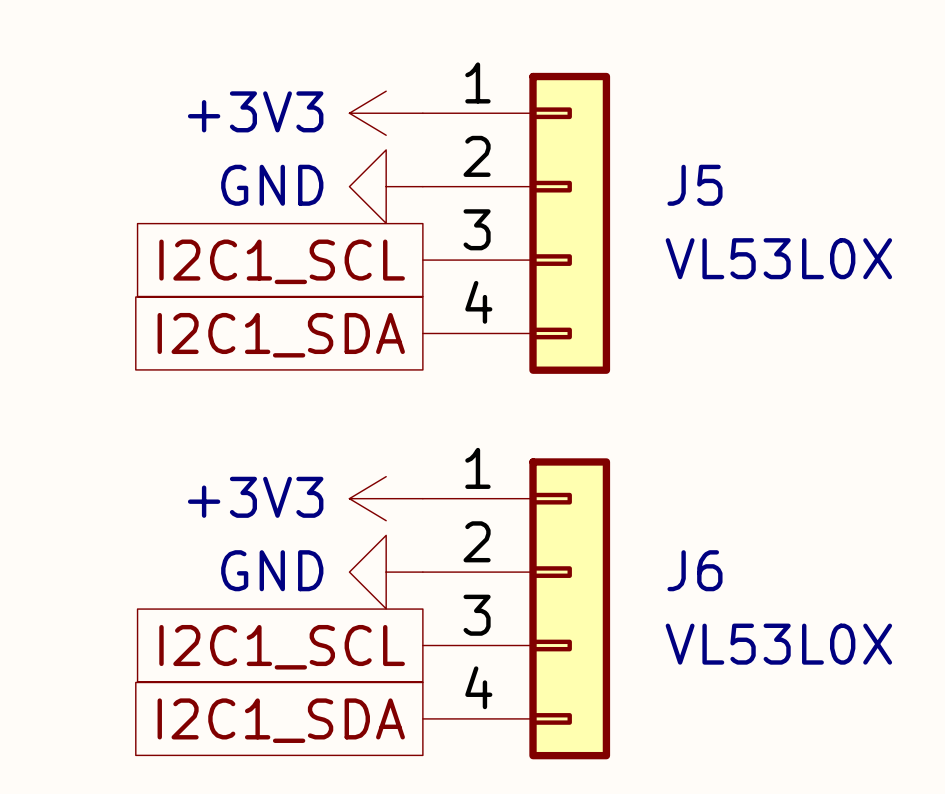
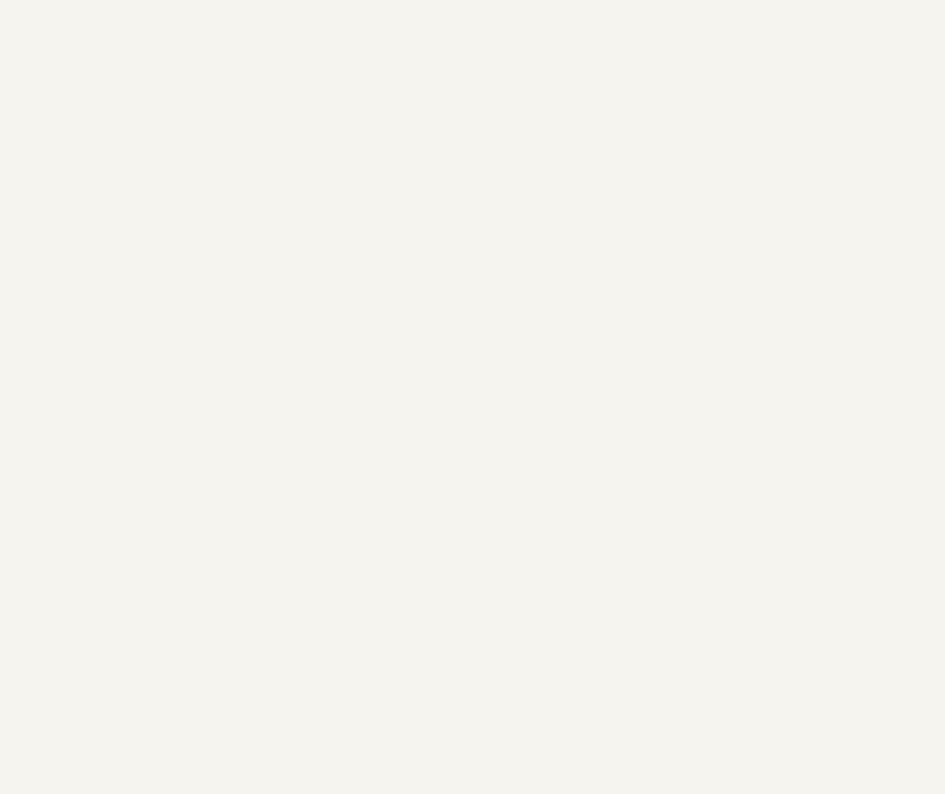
power symbol: +3V3 (386, 113) -> none
power symbol: GND (386, 186) -> none
J5: VL53L0X (516, 223) -> none
global label: I2C1_SCL (282, 261) -> none
global label: I2C1_SDA (281, 335) -> none
power symbol: +3V3 (386, 498) -> none
power symbol: GND (386, 572) -> none
J6: VL53L0X (516, 608) -> none
global label: I2C1_SCL (282, 647) -> none
global label: I2C1_SDA (281, 720) -> none

